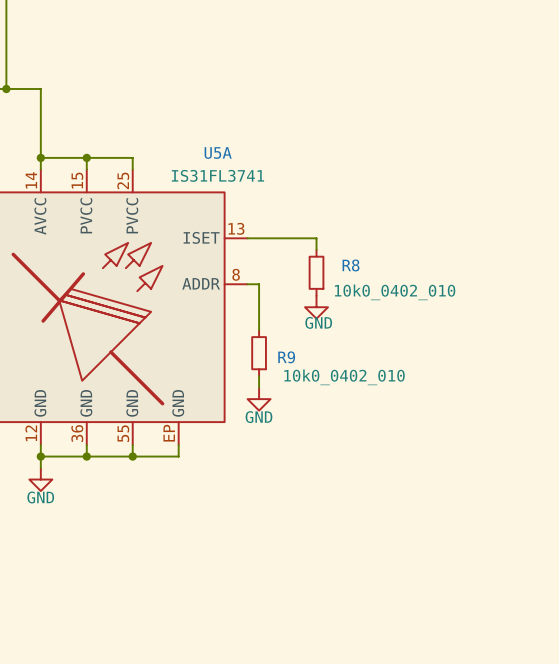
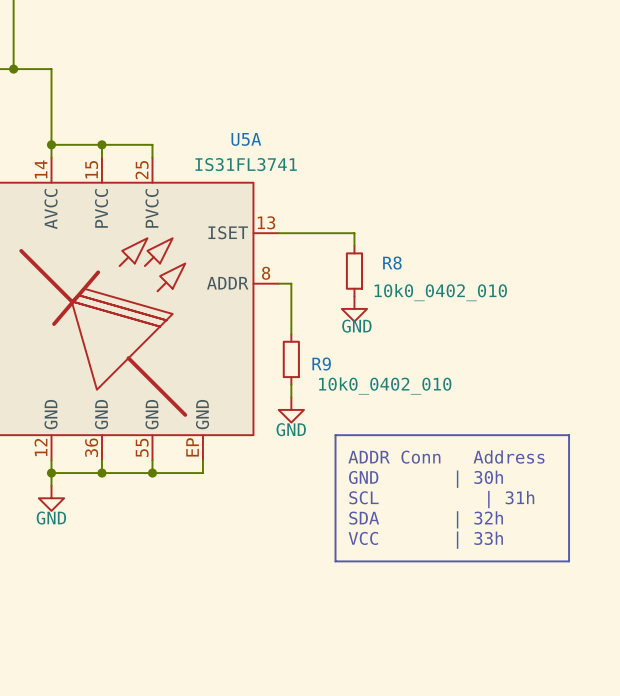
line: none -> (335, 435) (569, 435) (569, 561) (335, 561) (335, 435)
text: none -> ADDR Conn Address (446, 457)
text: none -> GND | 30h (425, 479)
text: none -> SCL | 31h (441, 499)
text: none -> SDA | 32h (426, 519)
text: none -> VCC | 33h (425, 540)

